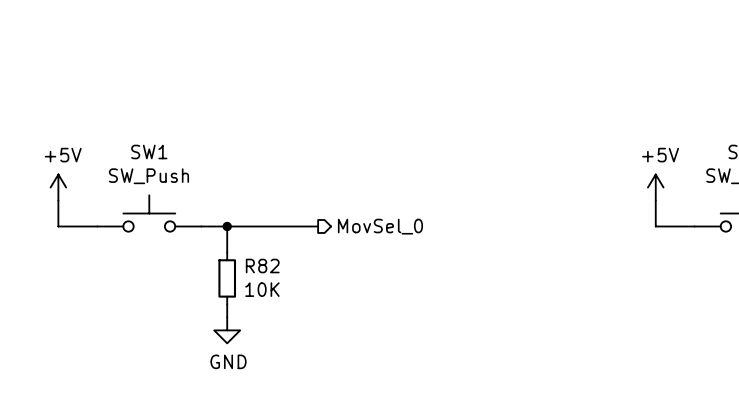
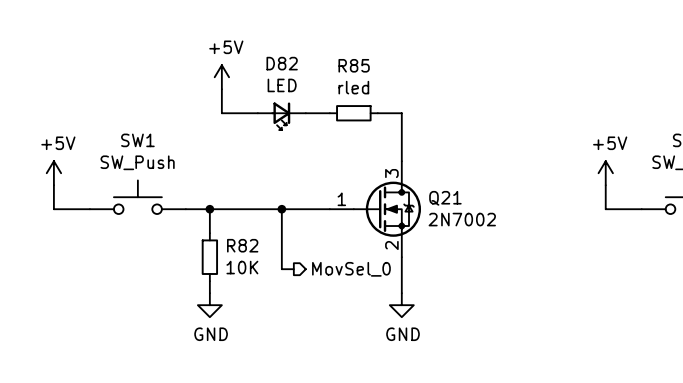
power symbol: none -> +5V (221, 77)
wire: none -> (221, 89) (221, 113) (257, 113)
wire: none -> (305, 113) (329, 113)
R85: none -> rled (353, 113)
wire: none -> (377, 113) (401, 113) (401, 161)
D82: none -> LED (281, 116)
wire: none -> (281, 209) (281, 269) (293, 269)
junction: none -> (281, 209)
wire: none -> (293, 209) (329, 209)
hierarchical label position: MovSel_0 (380, 226) -> MovSel_0 (351, 269)
Q21: none -> 2N7002 (375, 209)
wire: none -> (401, 257) (401, 293)
power symbol: none -> GND (401, 305)

